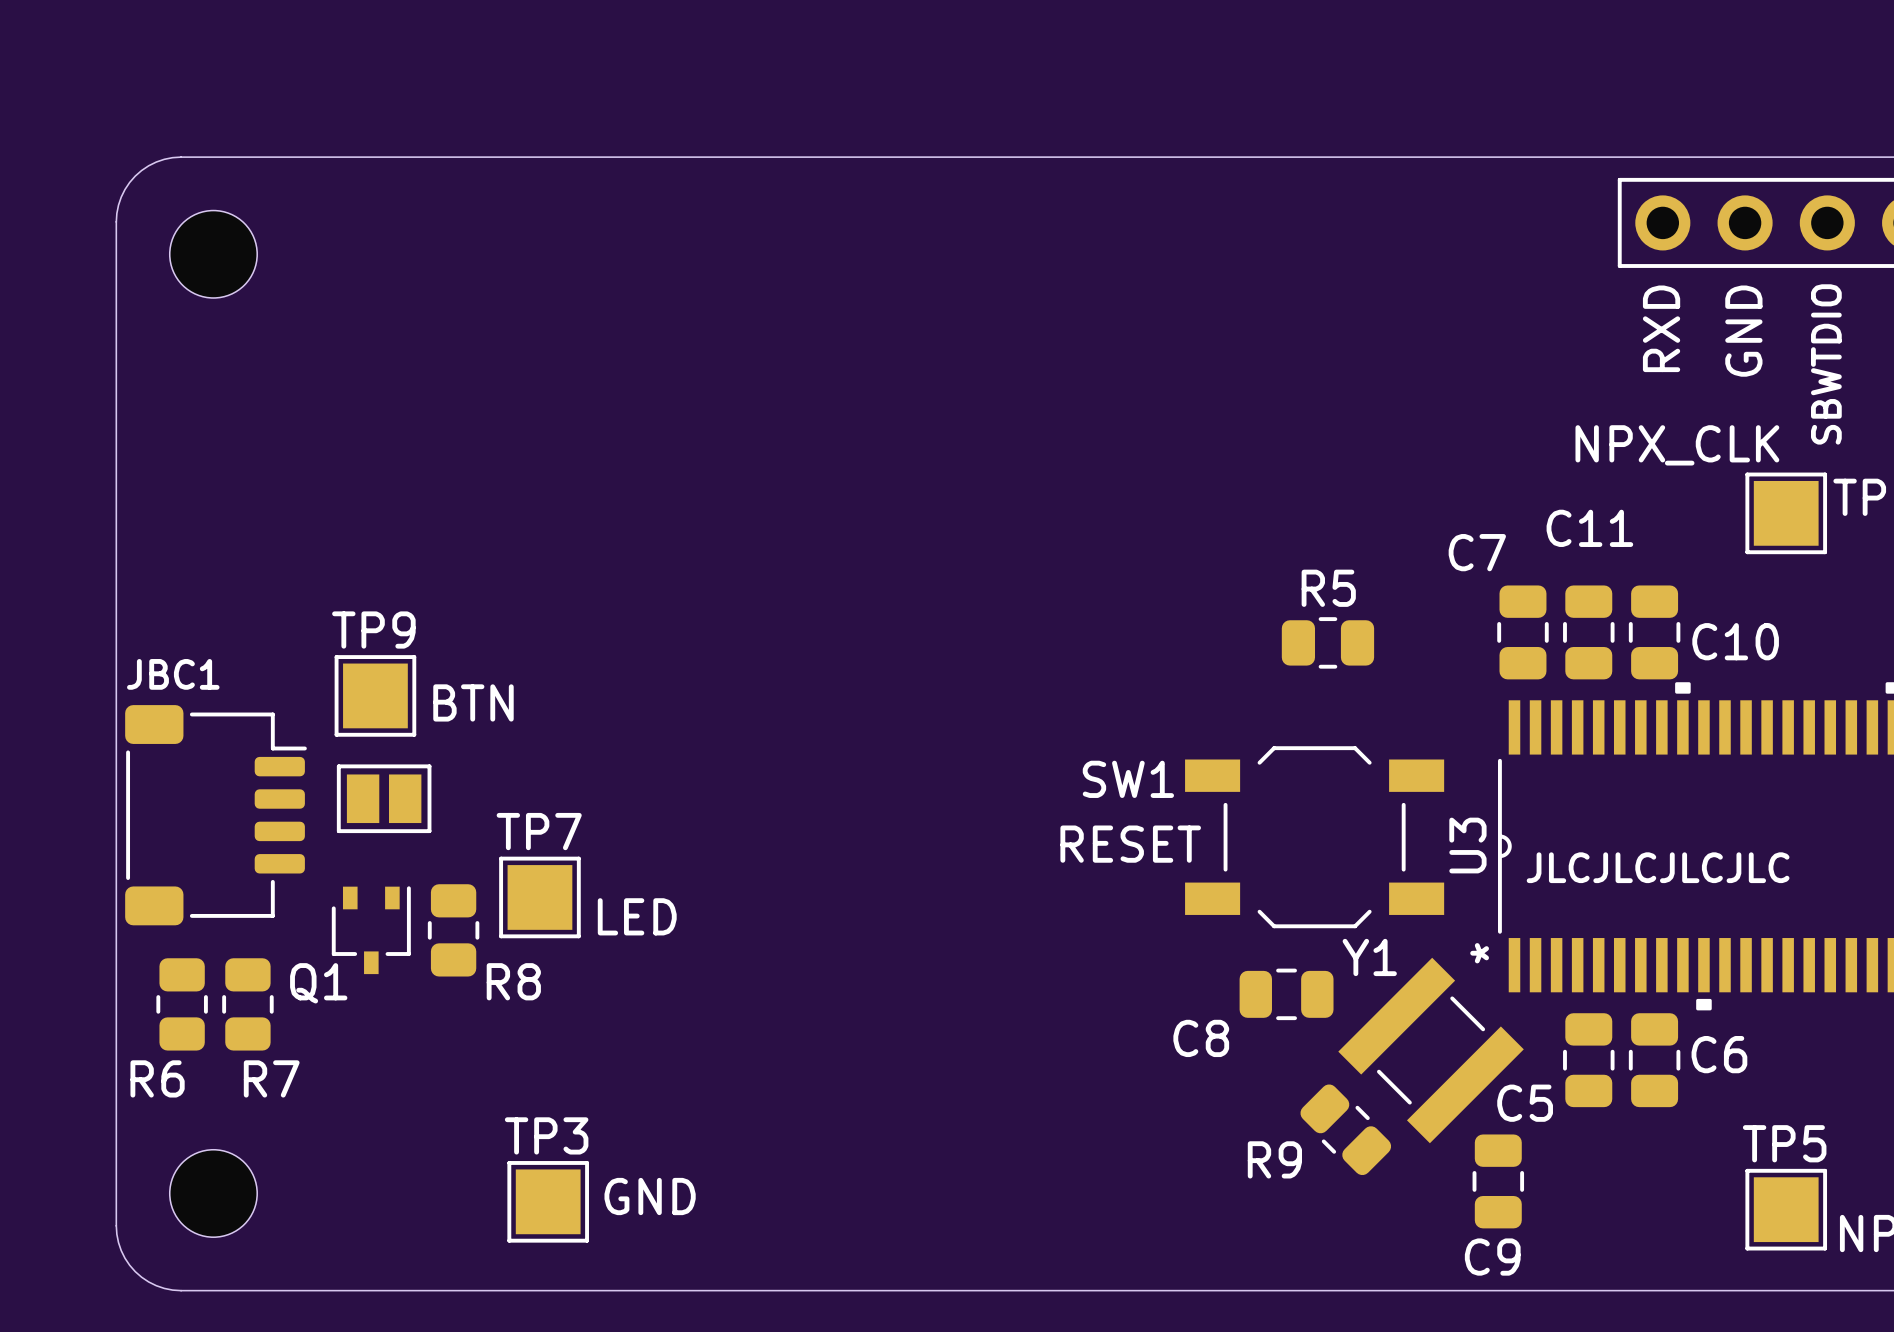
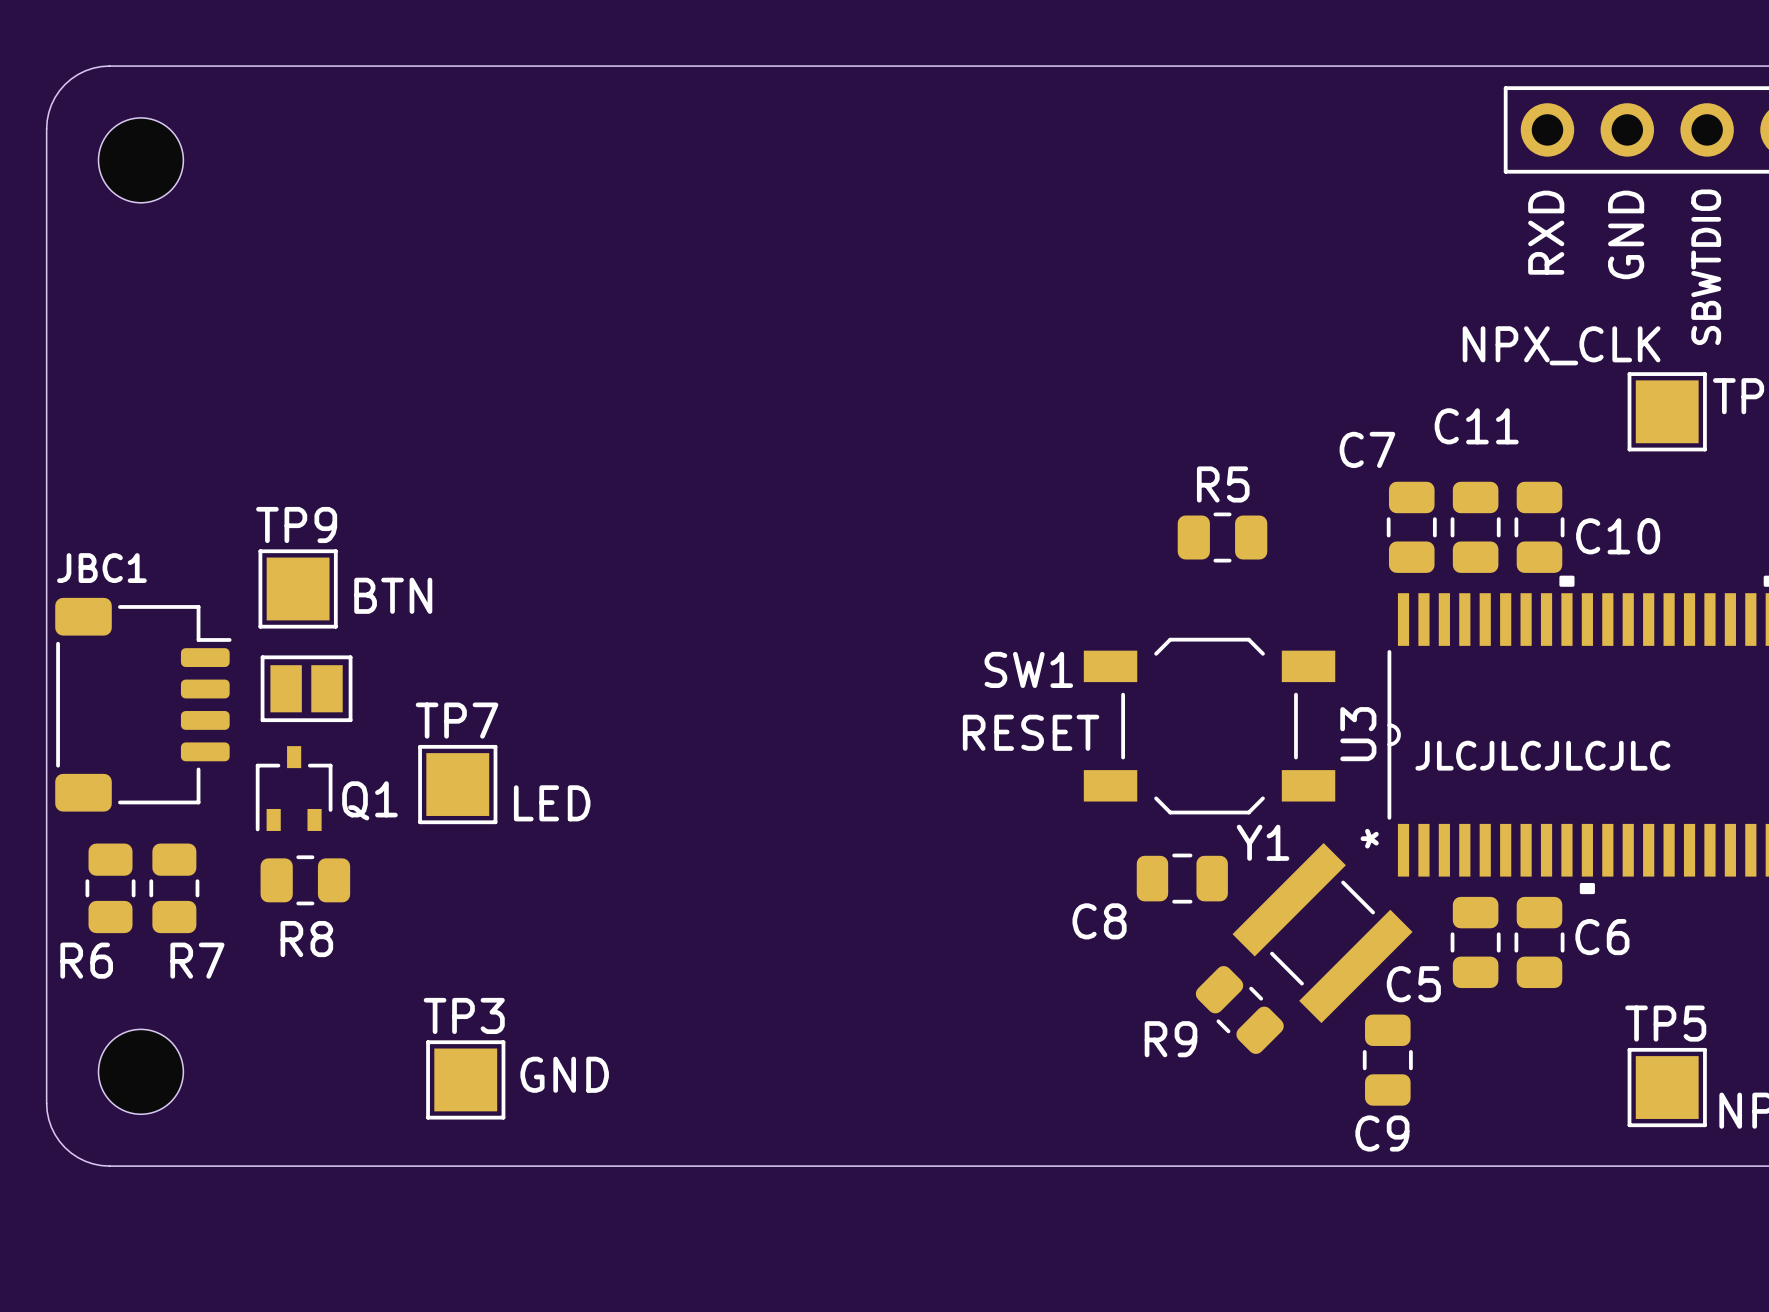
Q1 rotation: 0° (371, 930) -> 180° (294, 788)
R8 rotation: 0° (453, 930) -> 90° clockwise (305, 880)
R8 position: (453, 930) -> (305, 880)
Q1 name position: Q1 (318, 983) -> Q1 (369, 800)

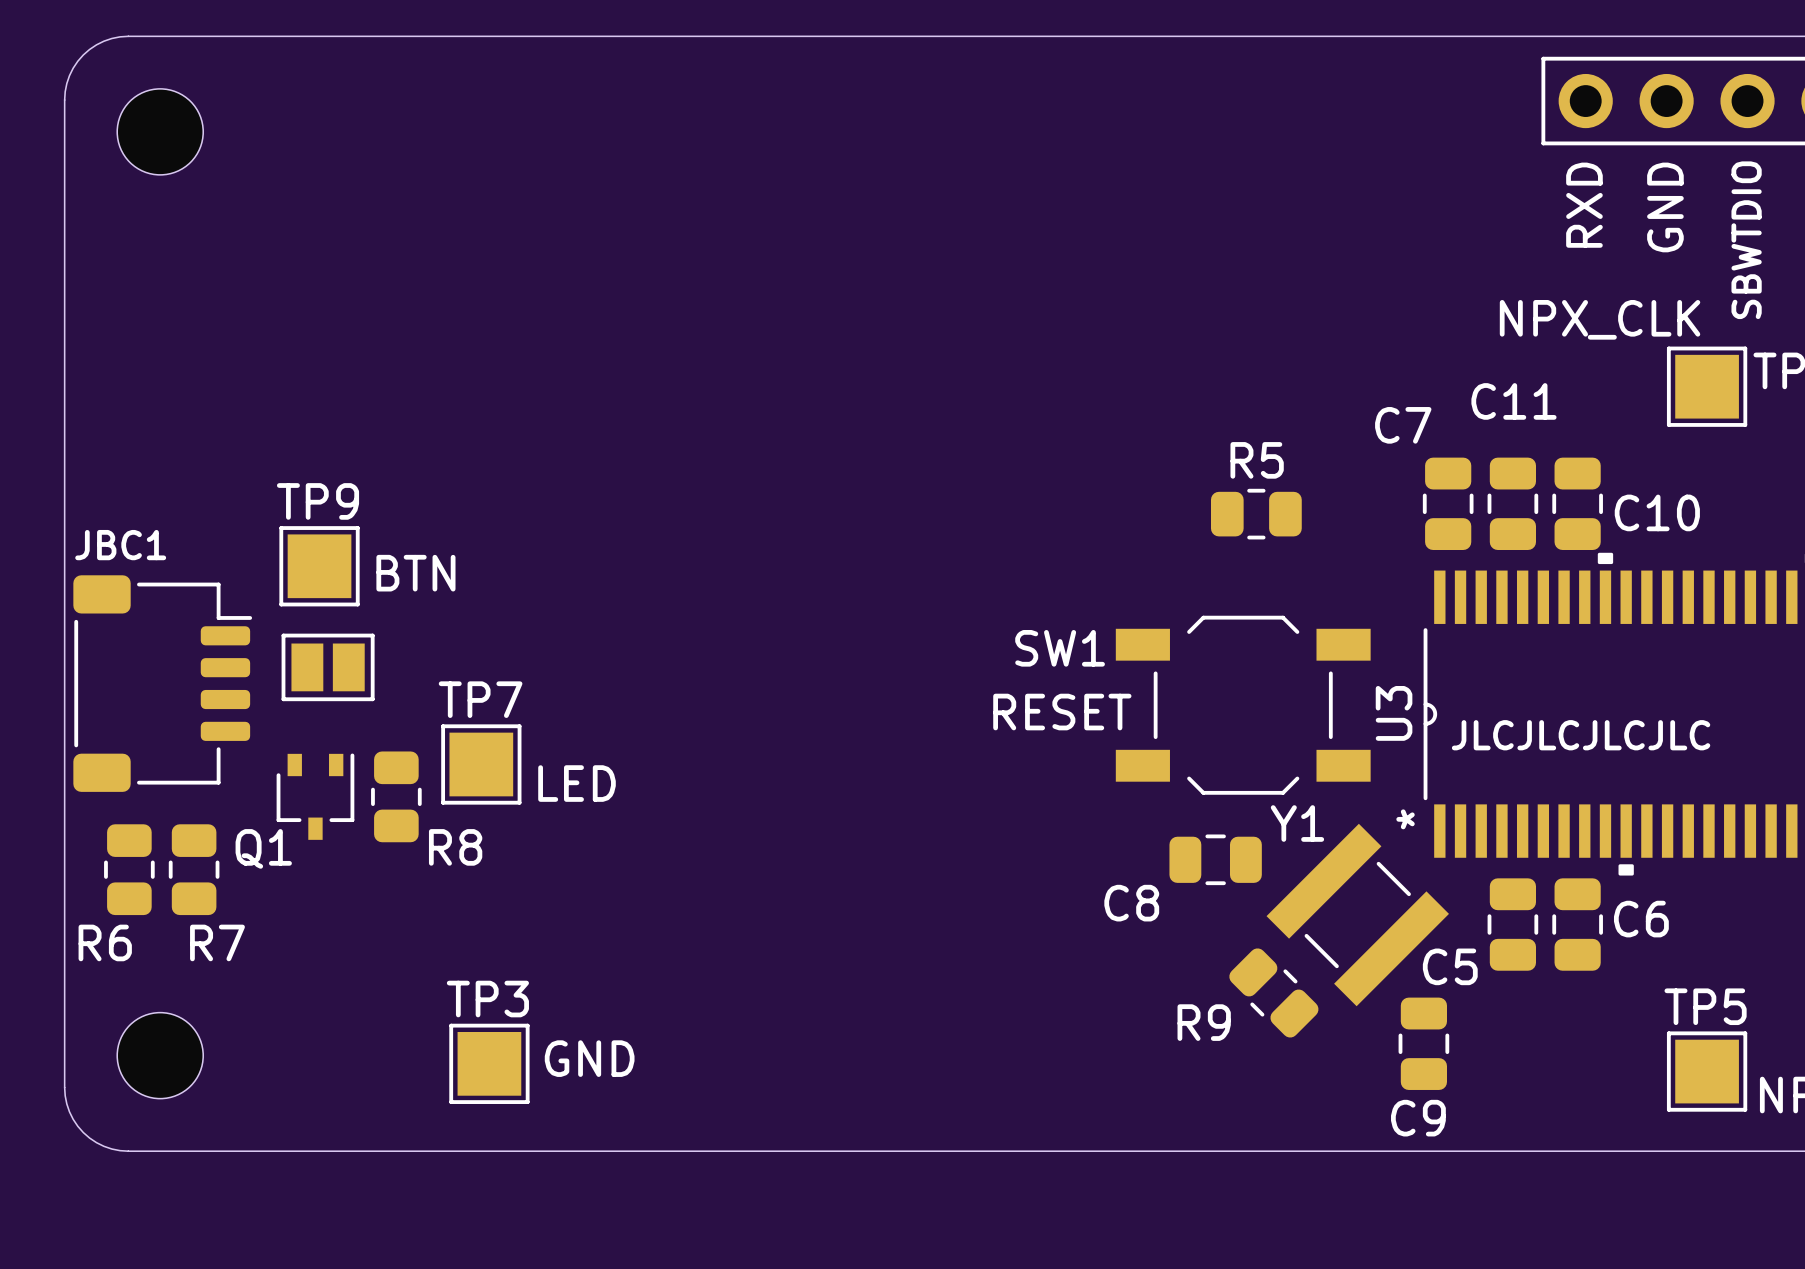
Q1 rotation: 0° (294, 788) -> 180° (315, 796)
Q1 name position: Q1 (369, 800) -> Q1 (263, 848)
R8 rotation: 0° (305, 880) -> 90° clockwise (396, 796)
R8 position: (305, 880) -> (396, 796)

